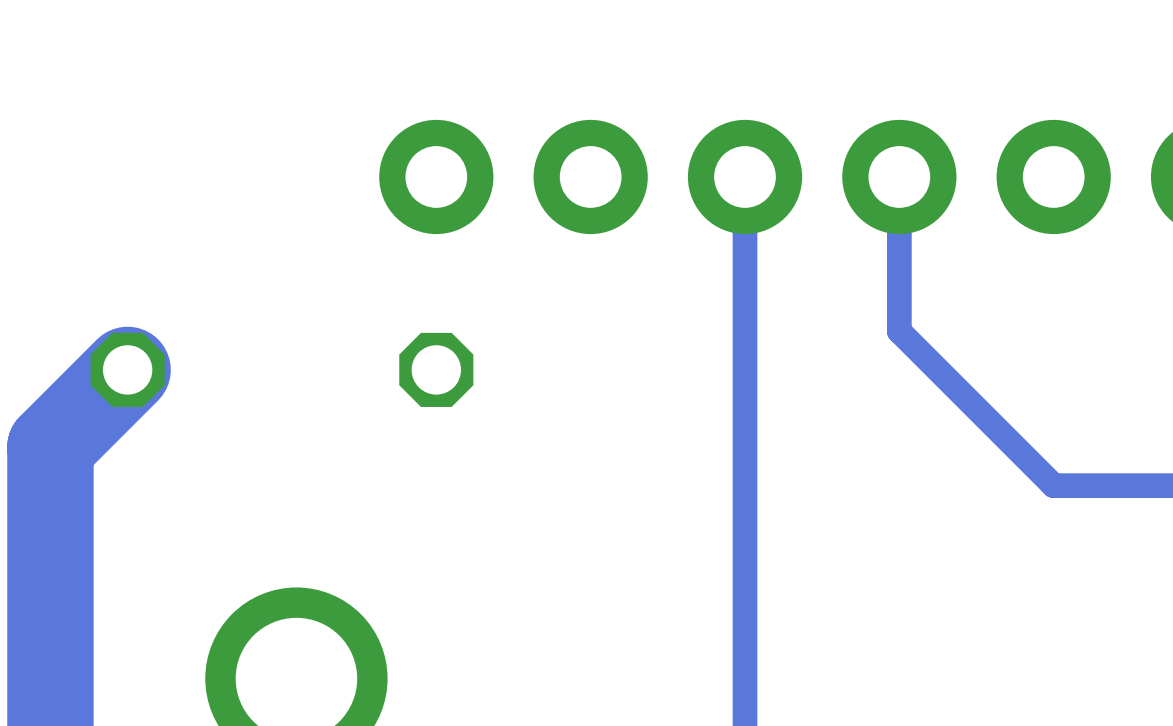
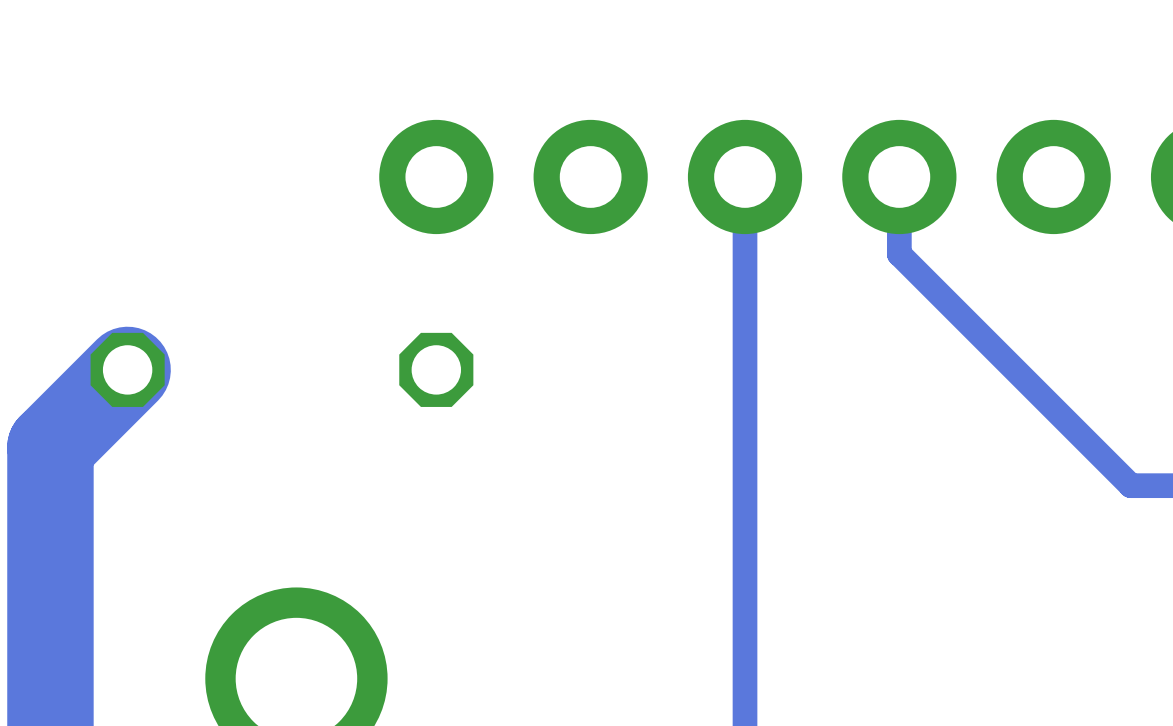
track: (899, 254) (899, 331) (1053, 485) (1130, 485) -> (899, 254) (1130, 485)

